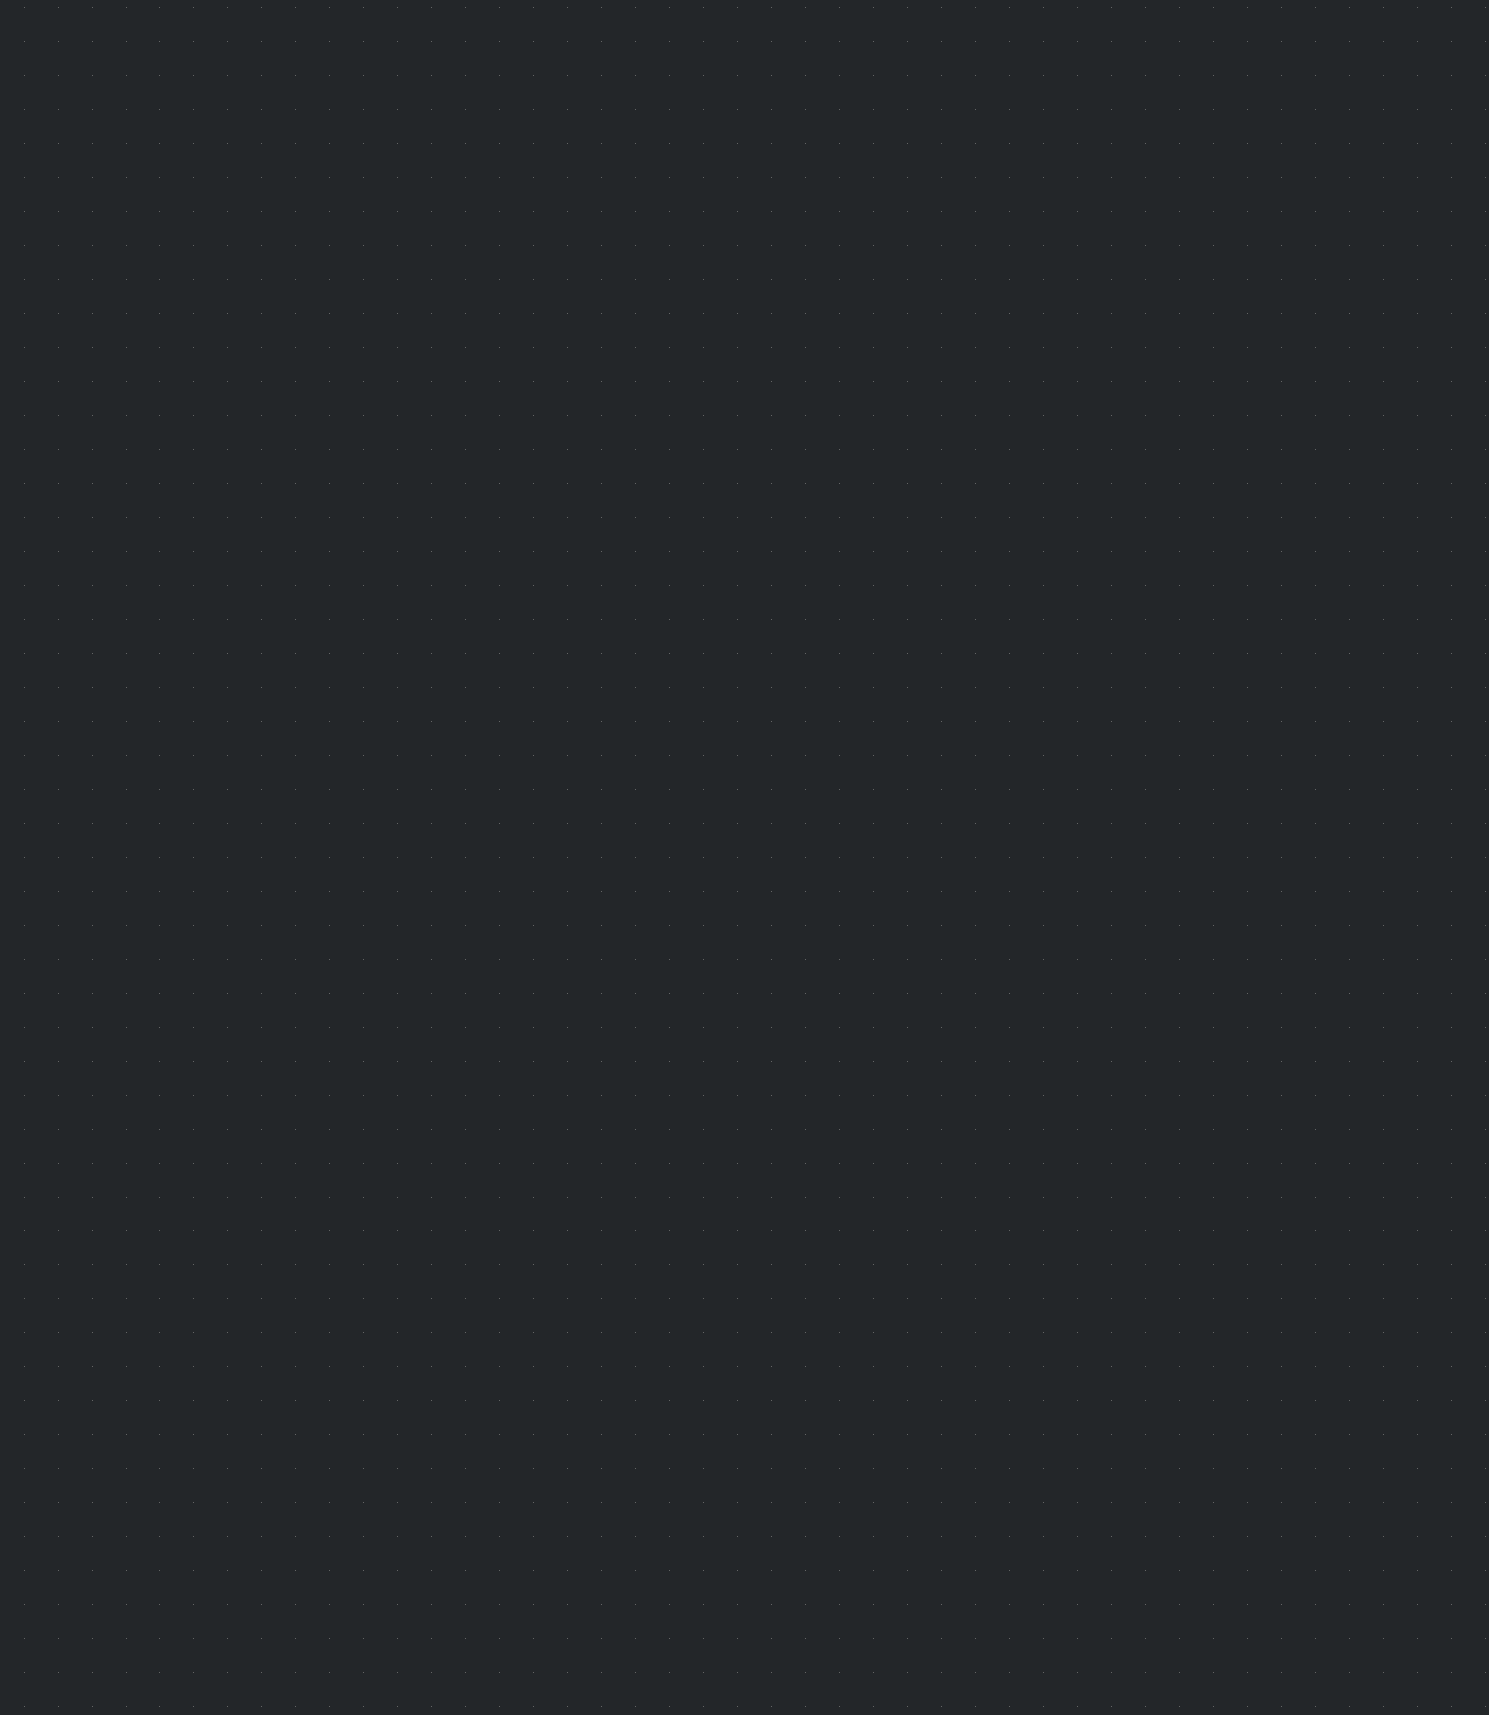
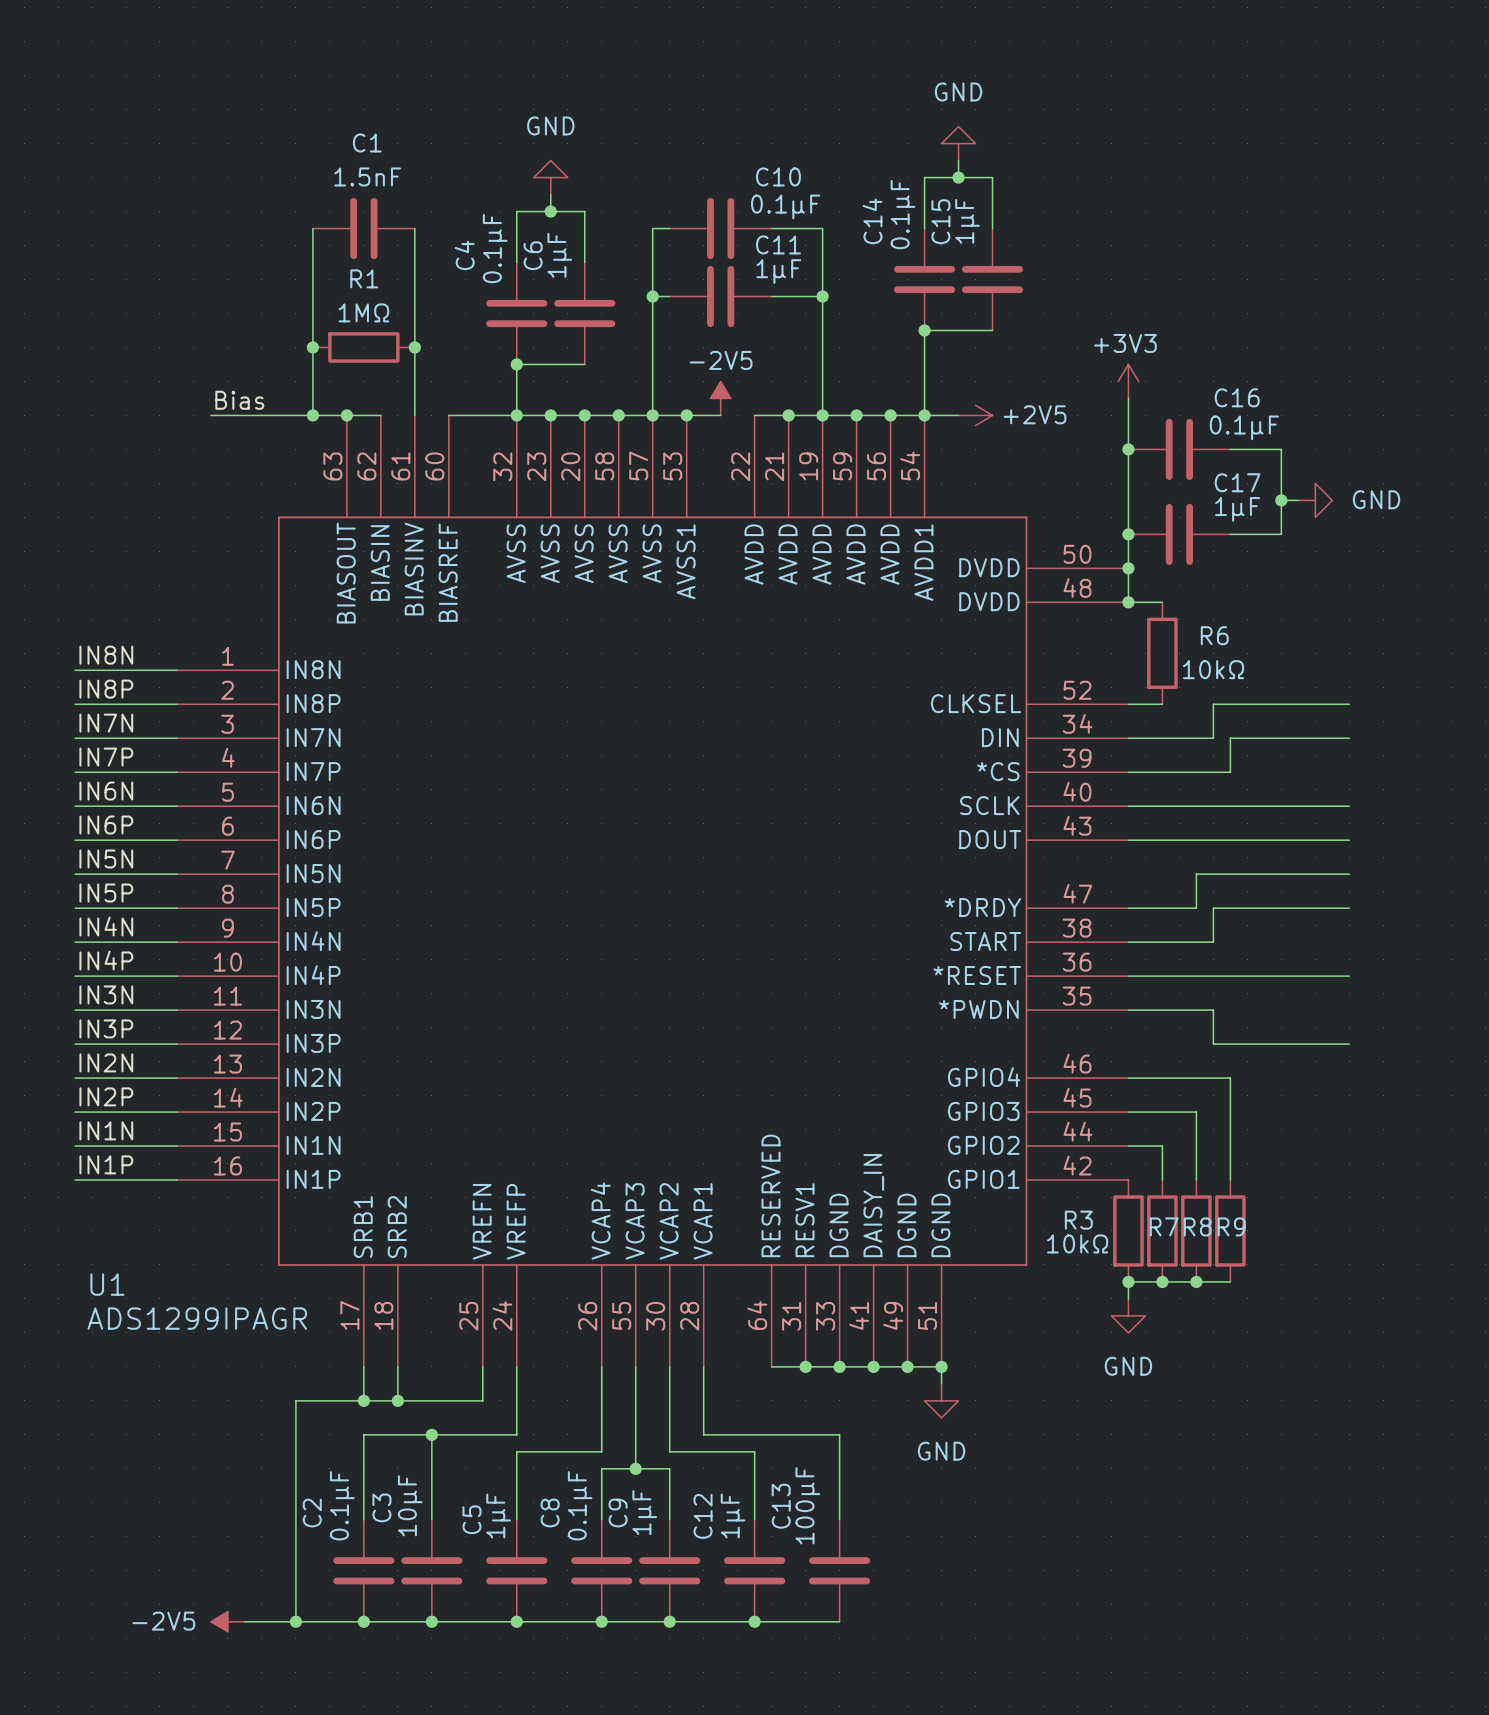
power symbol: none -> GND (958, 143)
wire: none -> (958, 160) (958, 177)
power symbol: none -> GND (550, 177)
junction: none -> (958, 177)
wire: none -> (550, 194) (550, 211)
junction: none -> (550, 211)
wire: none -> (312, 228) (312, 415)
C1: none -> 1.5nF (363, 228)
wire: none -> (414, 228) (414, 415)
wire: none -> (669, 228) (652, 228) (652, 415)
C10: none -> 0.1µF (720, 228)
wire: none -> (771, 228) (822, 228) (822, 415)
wire: none -> (924, 228) (924, 177) (992, 177) (992, 228)
wire: none -> (516, 262) (516, 211) (584, 211) (584, 262)
C14: none -> 0.1µF (924, 279)
C15: none -> 1µF (992, 279)
wire: none -> (652, 296) (669, 296)
junction: none -> (652, 296)
C11: none -> 1µF (720, 296)
wire: none -> (771, 296) (822, 296)
junction: none -> (822, 296)
C4: none -> 0.1µF (516, 313)
C6: none -> 1µF (584, 313)
junction: none -> (924, 330)
wire: none -> (992, 330) (924, 330) (924, 415)
junction: none -> (312, 347)
R1: none -> 1MΩ (363, 347)
junction: none -> (414, 347)
junction: none -> (516, 364)
wire: none -> (584, 364) (516, 364) (516, 415)
power symbol: none -> +3V3 (1128, 381)
power symbol: none -> -2V5 (720, 398)
wire: none -> (1128, 398) (1128, 602) (1162, 602)
label: none -> Bias (239, 400)
wire: none -> (210, 415) (380, 415)
junction: none -> (312, 415)
junction: none -> (346, 415)
wire: none -> (448, 415) (720, 415)
junction: none -> (516, 415)
junction: none -> (550, 415)
junction: none -> (584, 415)
junction: none -> (618, 415)
junction: none -> (652, 415)
junction: none -> (686, 415)
wire: none -> (754, 415) (958, 415)
junction: none -> (788, 415)
junction: none -> (822, 415)
junction: none -> (856, 415)
junction: none -> (890, 415)
junction: none -> (924, 415)
power symbol: none -> +2V5 (975, 415)
junction: none -> (1128, 449)
C16: none -> 0.1µF (1179, 449)
wire: none -> (1230, 449) (1281, 449) (1281, 534) (1230, 534)
wire: none -> (1281, 500) (1298, 500)
junction: none -> (1281, 500)
power symbol: none -> GND (1315, 500)
junction: none -> (1128, 534)
C17: none -> 1µF (1179, 534)
junction: none -> (1128, 568)
junction: none -> (1128, 602)
R6: none -> 10kΩ (1162, 653)
label: none -> IN8N (106, 655)
wire: none -> (75, 670) (176, 670)
label: none -> IN8P (106, 689)
wire: none -> (75, 704) (176, 704)
wire: none -> (1128, 704) (1162, 704)
wire: none -> (1349, 704) (1213, 704) (1213, 738) (1128, 738)
label: none -> IN7N (106, 723)
wire: none -> (75, 738) (176, 738)
wire: none -> (1349, 738) (1230, 738) (1230, 772) (1128, 772)
label: none -> IN7P (106, 757)
wire: none -> (75, 772) (176, 772)
label: none -> IN6N (106, 791)
wire: none -> (75, 806) (176, 806)
wire: none -> (1128, 806) (1349, 806)
label: none -> IN6P (106, 825)
wire: none -> (75, 840) (176, 840)
wire: none -> (1128, 840) (1349, 840)
label: none -> IN5N (106, 859)
wire: none -> (75, 874) (176, 874)
wire: none -> (1349, 874) (1196, 874) (1196, 908) (1128, 908)
U1: none -> ADS1299IPAGR (652, 891)
label: none -> IN5P (106, 893)
wire: none -> (75, 908) (176, 908)
wire: none -> (1349, 908) (1213, 908) (1213, 942) (1128, 942)
label: none -> IN4N (106, 926)
wire: none -> (75, 942) (176, 942)
label: none -> IN4P (106, 960)
wire: none -> (75, 976) (176, 976)
wire: none -> (1128, 976) (1349, 976)
label: none -> IN3N (106, 994)
wire: none -> (75, 1010) (176, 1010)
wire: none -> (1128, 1010) (1213, 1010) (1213, 1044) (1349, 1044)
label: none -> IN3P (106, 1028)
wire: none -> (75, 1044) (176, 1044)
label: none -> IN2N (106, 1062)
wire: none -> (75, 1078) (176, 1078)
wire: none -> (1128, 1078) (1230, 1078) (1230, 1180)
label: none -> IN2P (106, 1096)
wire: none -> (75, 1112) (176, 1112)
wire: none -> (1128, 1112) (1196, 1112) (1196, 1180)
label: none -> IN1N (106, 1130)
wire: none -> (75, 1146) (176, 1146)
wire: none -> (1128, 1146) (1162, 1146) (1162, 1180)
label: none -> IN1P (106, 1164)
wire: none -> (75, 1180) (176, 1180)
R3: none -> 10kΩ (1128, 1230)
R7: none -> (1162, 1230)
R8: none -> (1196, 1230)
R9: none -> (1230, 1230)
junction: none -> (1128, 1281)
junction: none -> (1162, 1281)
junction: none -> (1196, 1281)
wire: none -> (1230, 1281) (1128, 1281) (1128, 1298)
power symbol: none -> GND (1128, 1315)
wire: none -> (363, 1366) (363, 1400)
wire: none -> (397, 1366) (397, 1400)
wire: none -> (482, 1366) (482, 1400) (295, 1400) (295, 1621)
wire: none -> (516, 1366) (516, 1434) (363, 1434) (363, 1519)
wire: none -> (601, 1366) (601, 1451) (516, 1451) (516, 1519)
wire: none -> (635, 1366) (635, 1468)
wire: none -> (669, 1366) (669, 1451) (754, 1451) (754, 1519)
wire: none -> (703, 1366) (703, 1434) (839, 1434) (839, 1519)
wire: none -> (771, 1366) (941, 1366) (941, 1383)
junction: none -> (805, 1366)
junction: none -> (839, 1366)
junction: none -> (873, 1366)
junction: none -> (907, 1366)
junction: none -> (941, 1366)
junction: none -> (363, 1400)
junction: none -> (397, 1400)
power symbol: none -> GND (941, 1400)
wire: none -> (431, 1434) (431, 1519)
junction: none -> (431, 1434)
junction: none -> (635, 1468)
wire: none -> (601, 1519) (601, 1468) (669, 1468) (669, 1519)
C2: none -> 0.1µF (363, 1570)
C3: none -> 10µF (431, 1570)
C5: none -> 1µF (516, 1570)
C8: none -> 0.1µF (601, 1570)
C9: none -> 1µF (669, 1570)
C12: none -> 1µF (754, 1570)
C13: none -> 100µF (839, 1570)
power symbol: none -> -2V5 (227, 1621)
wire: none -> (244, 1621) (839, 1621)
junction: none -> (295, 1621)
junction: none -> (363, 1621)
junction: none -> (431, 1621)
junction: none -> (516, 1621)
junction: none -> (601, 1621)
junction: none -> (669, 1621)
junction: none -> (754, 1621)

